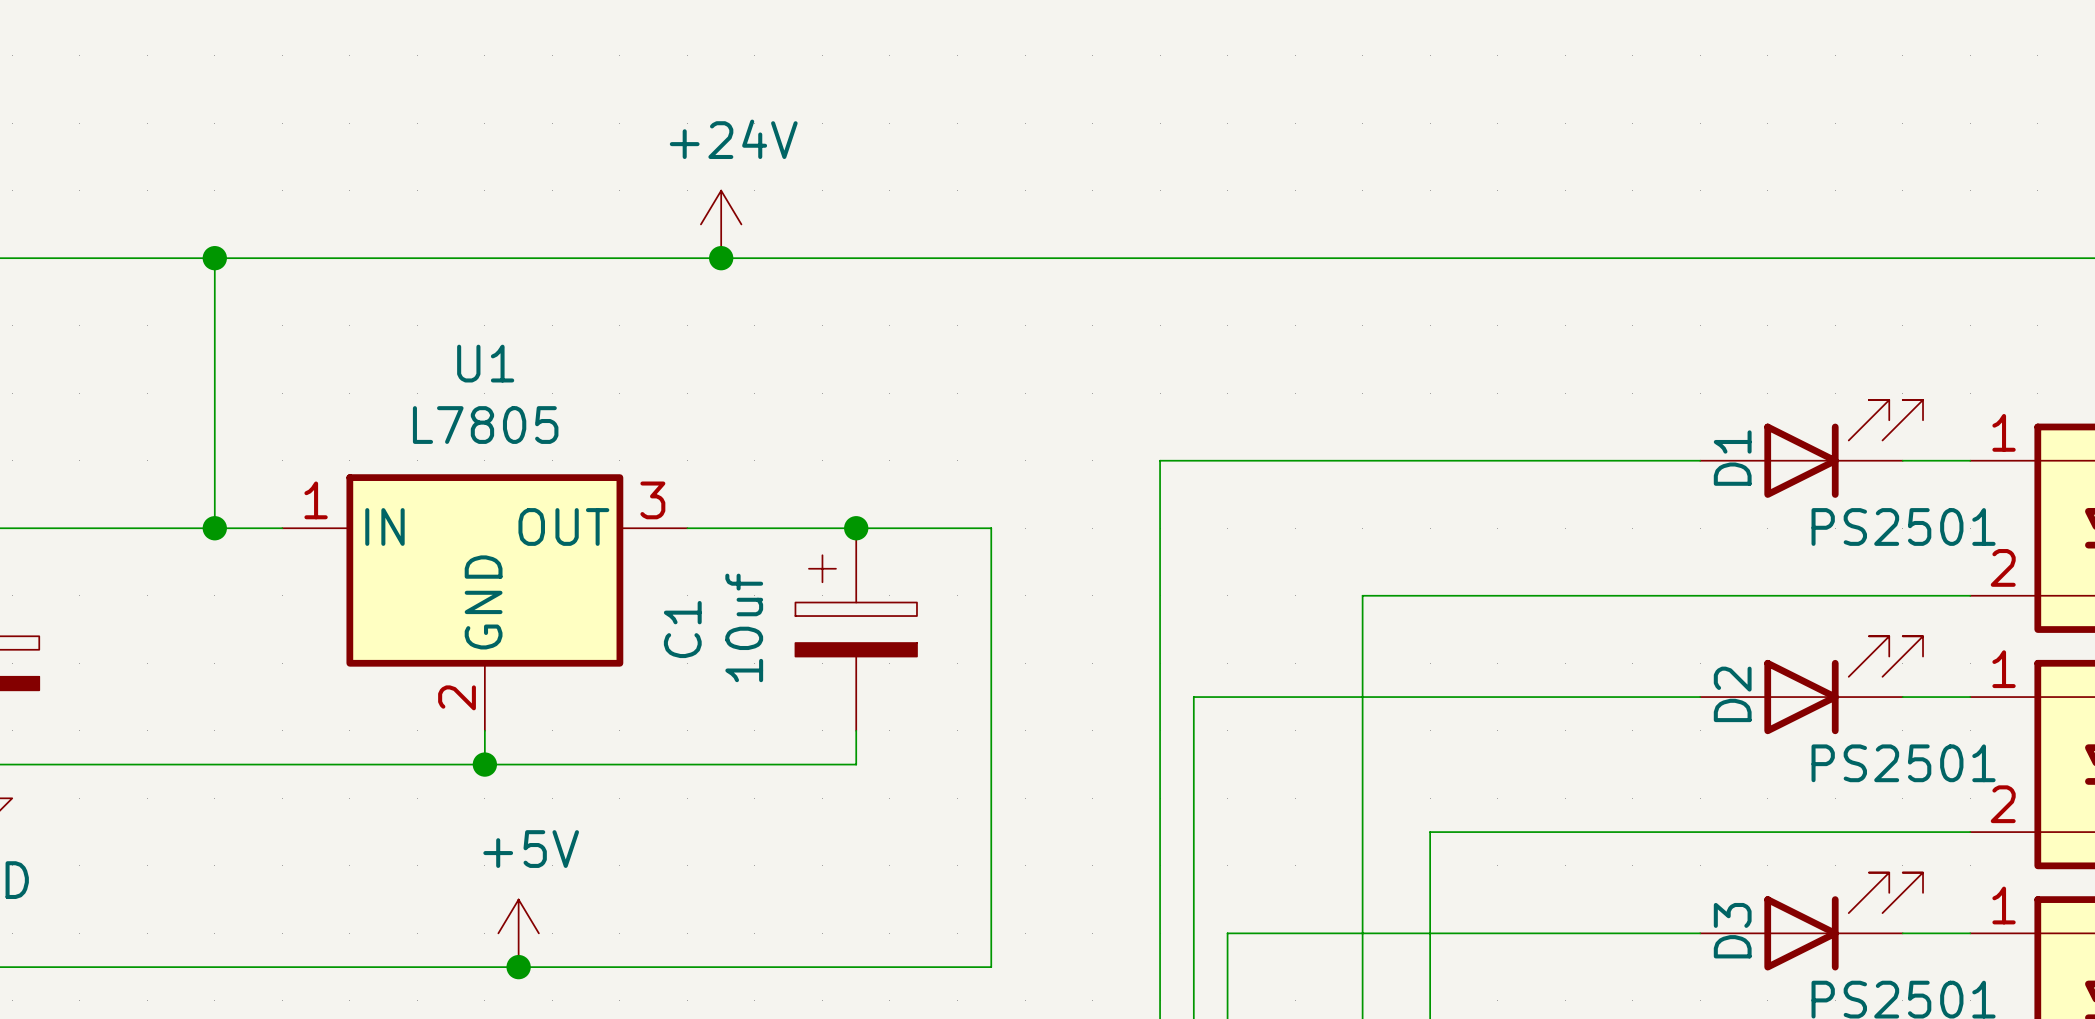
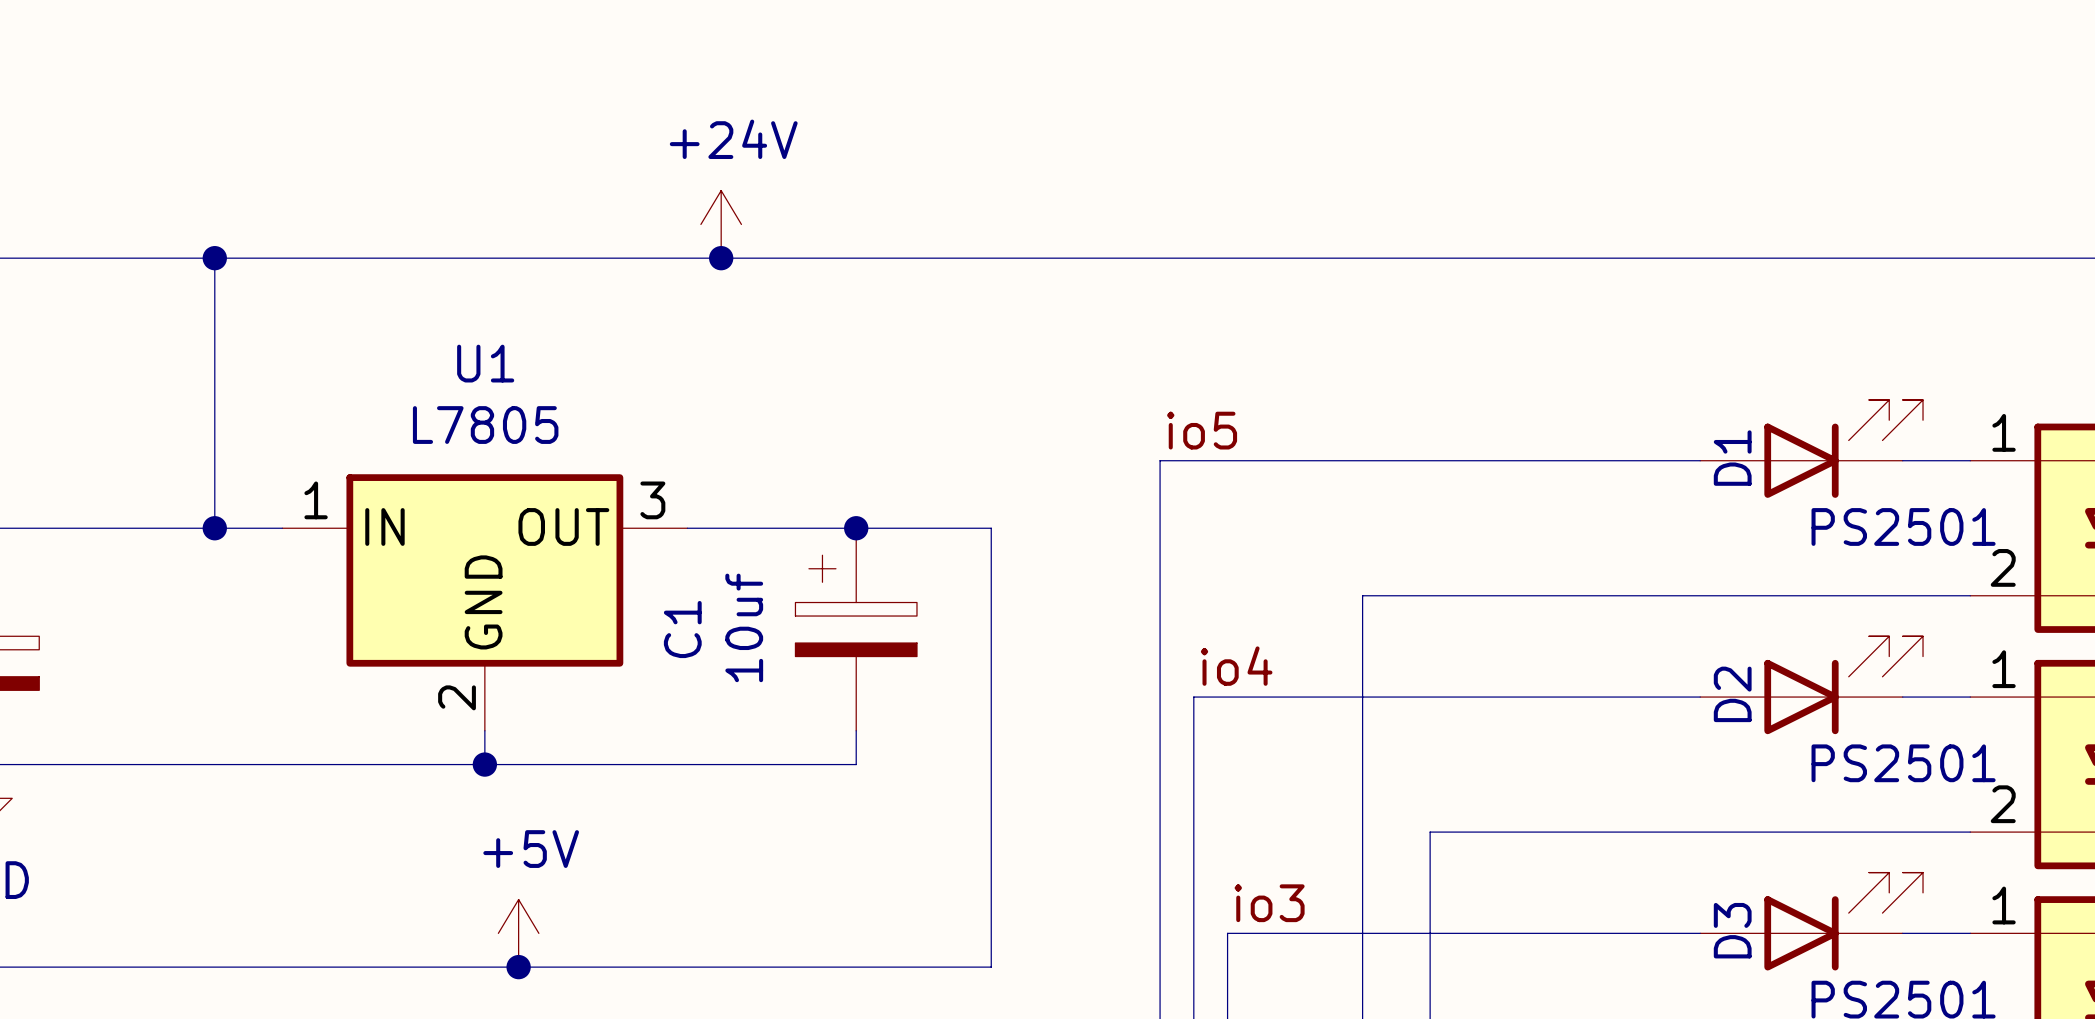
label: none -> io5 (1202, 430)
label: none -> io4 (1236, 666)
label: none -> io3 (1269, 903)

